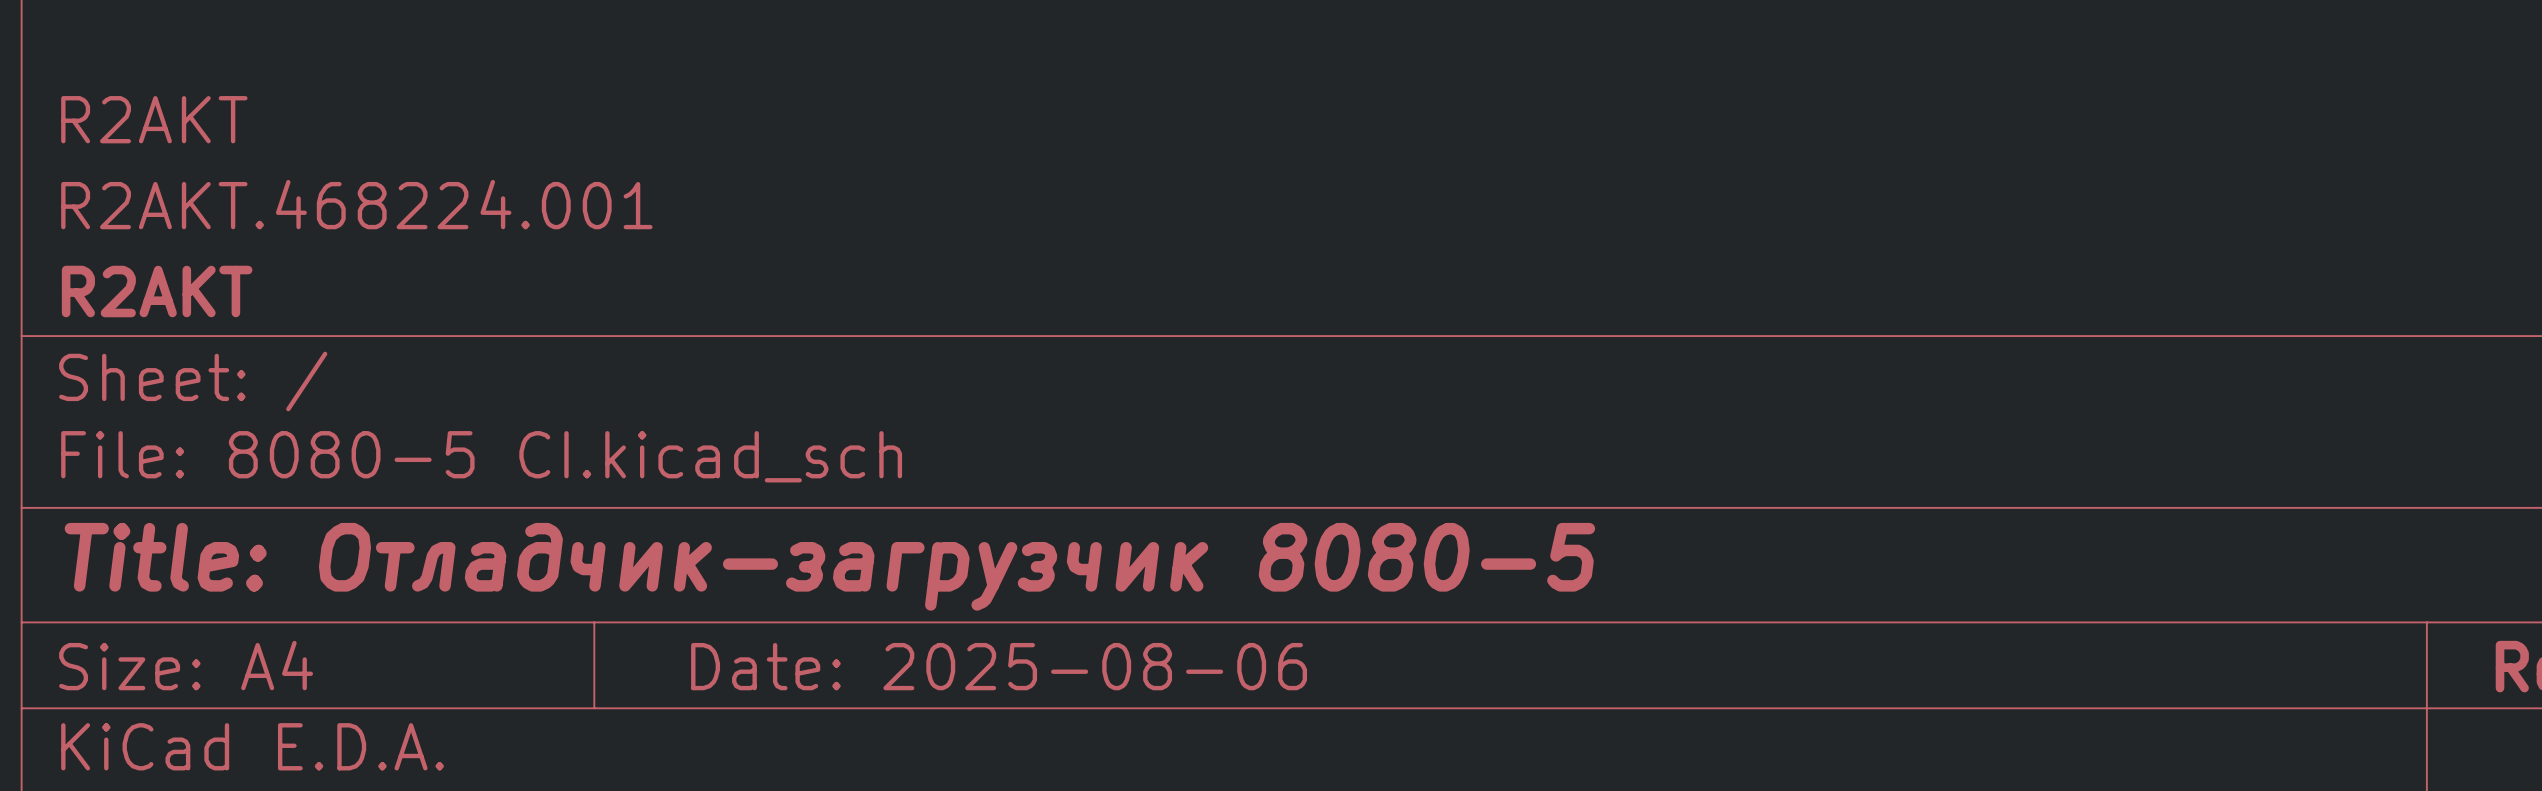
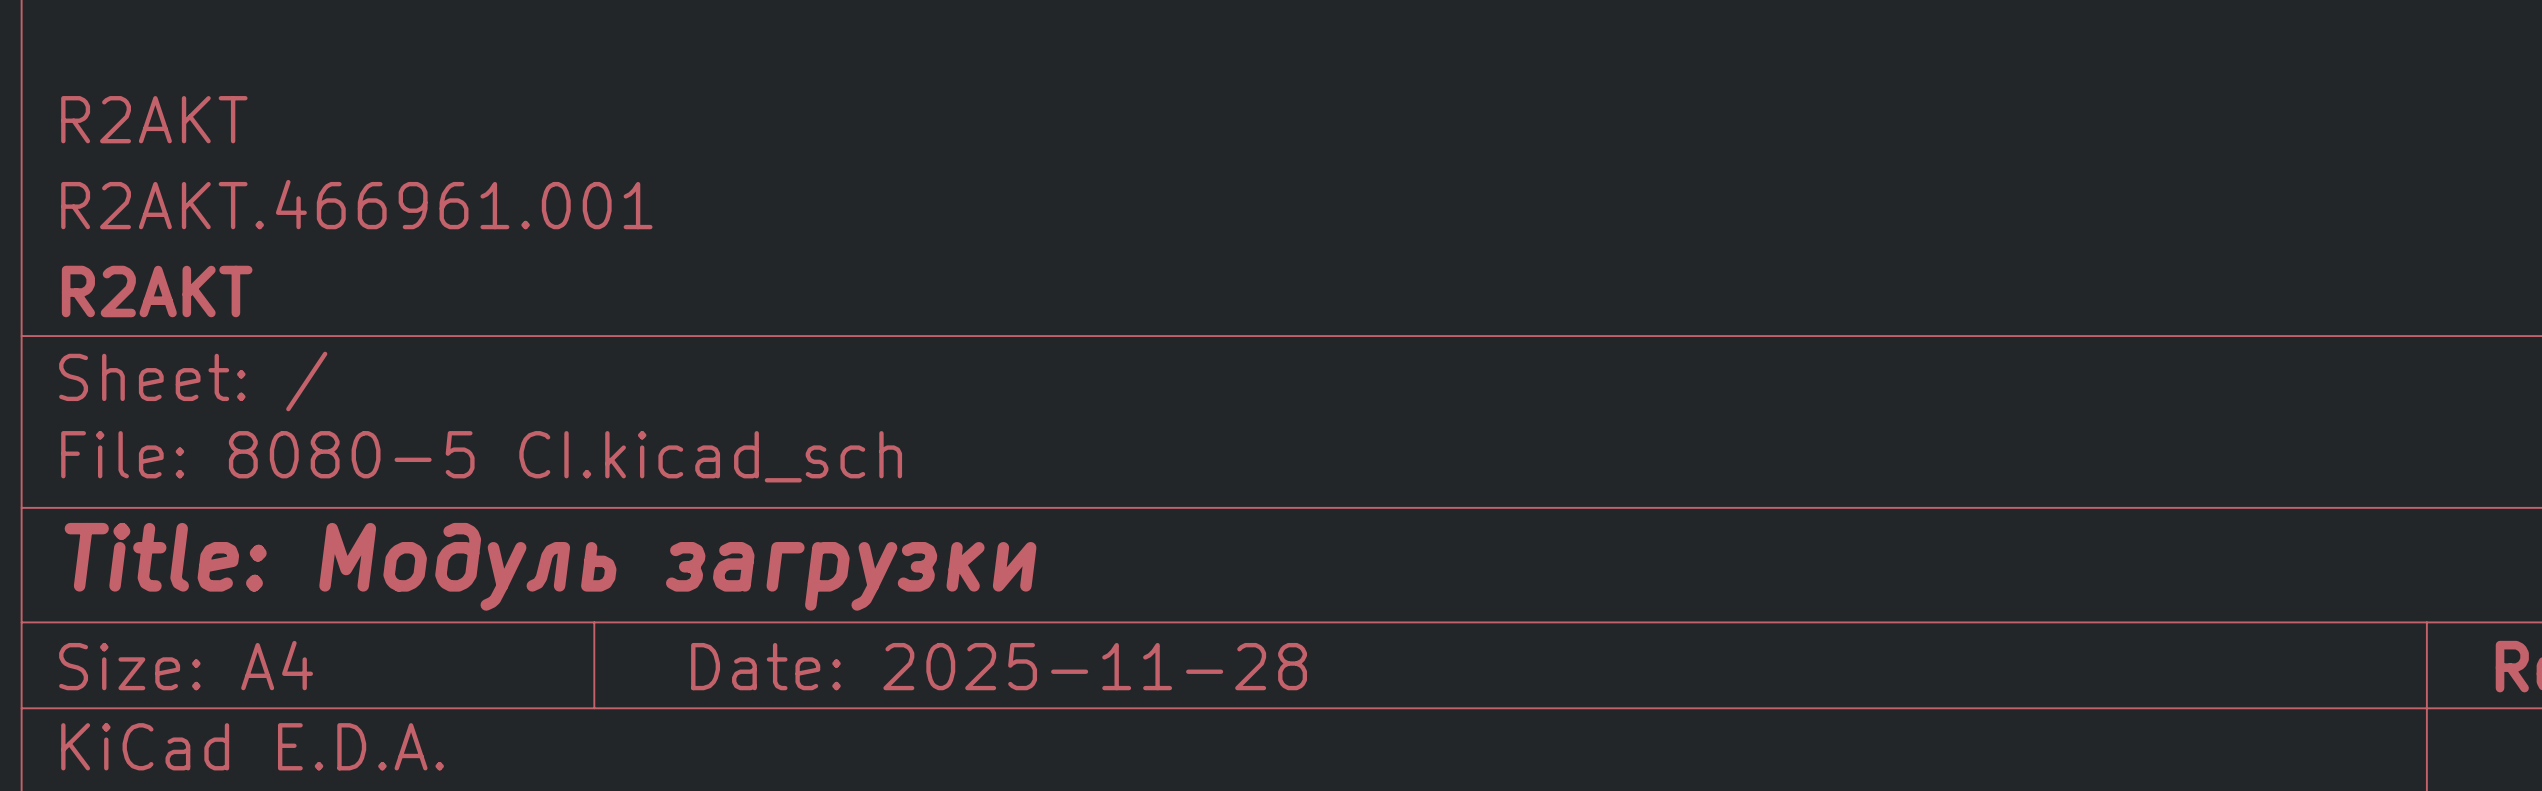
title block: R2AKT.468224.001 (356, 204) -> R2AKT.466961.001 (356, 204)
title block: Title: Отладчик-загрузчик 8080-5 (829, 566) -> Title: Модуль загрузки (550, 566)
title block: Date: 2025-08-06 (999, 666) -> Date: 2025-11-28 (999, 666)

